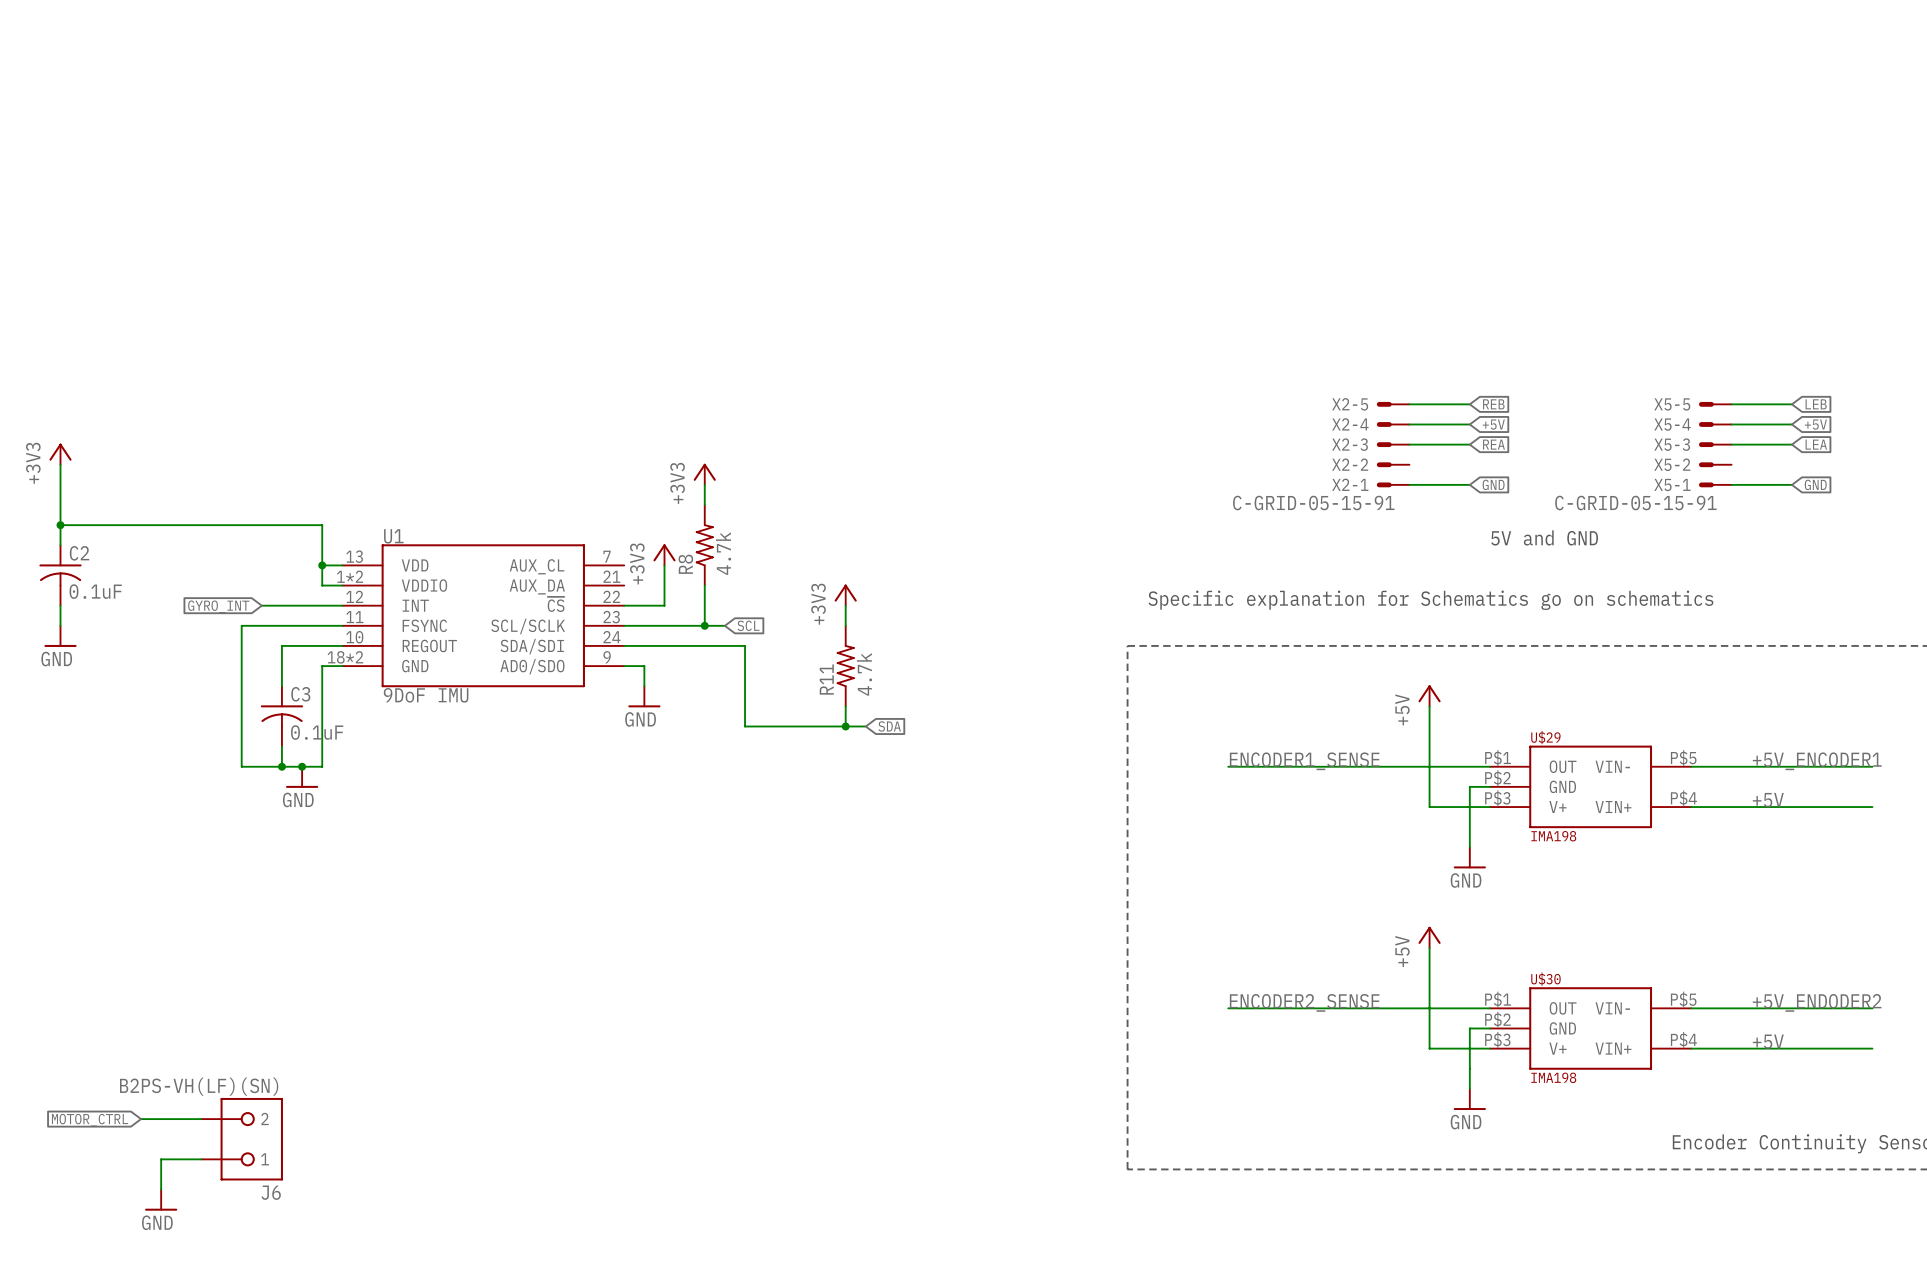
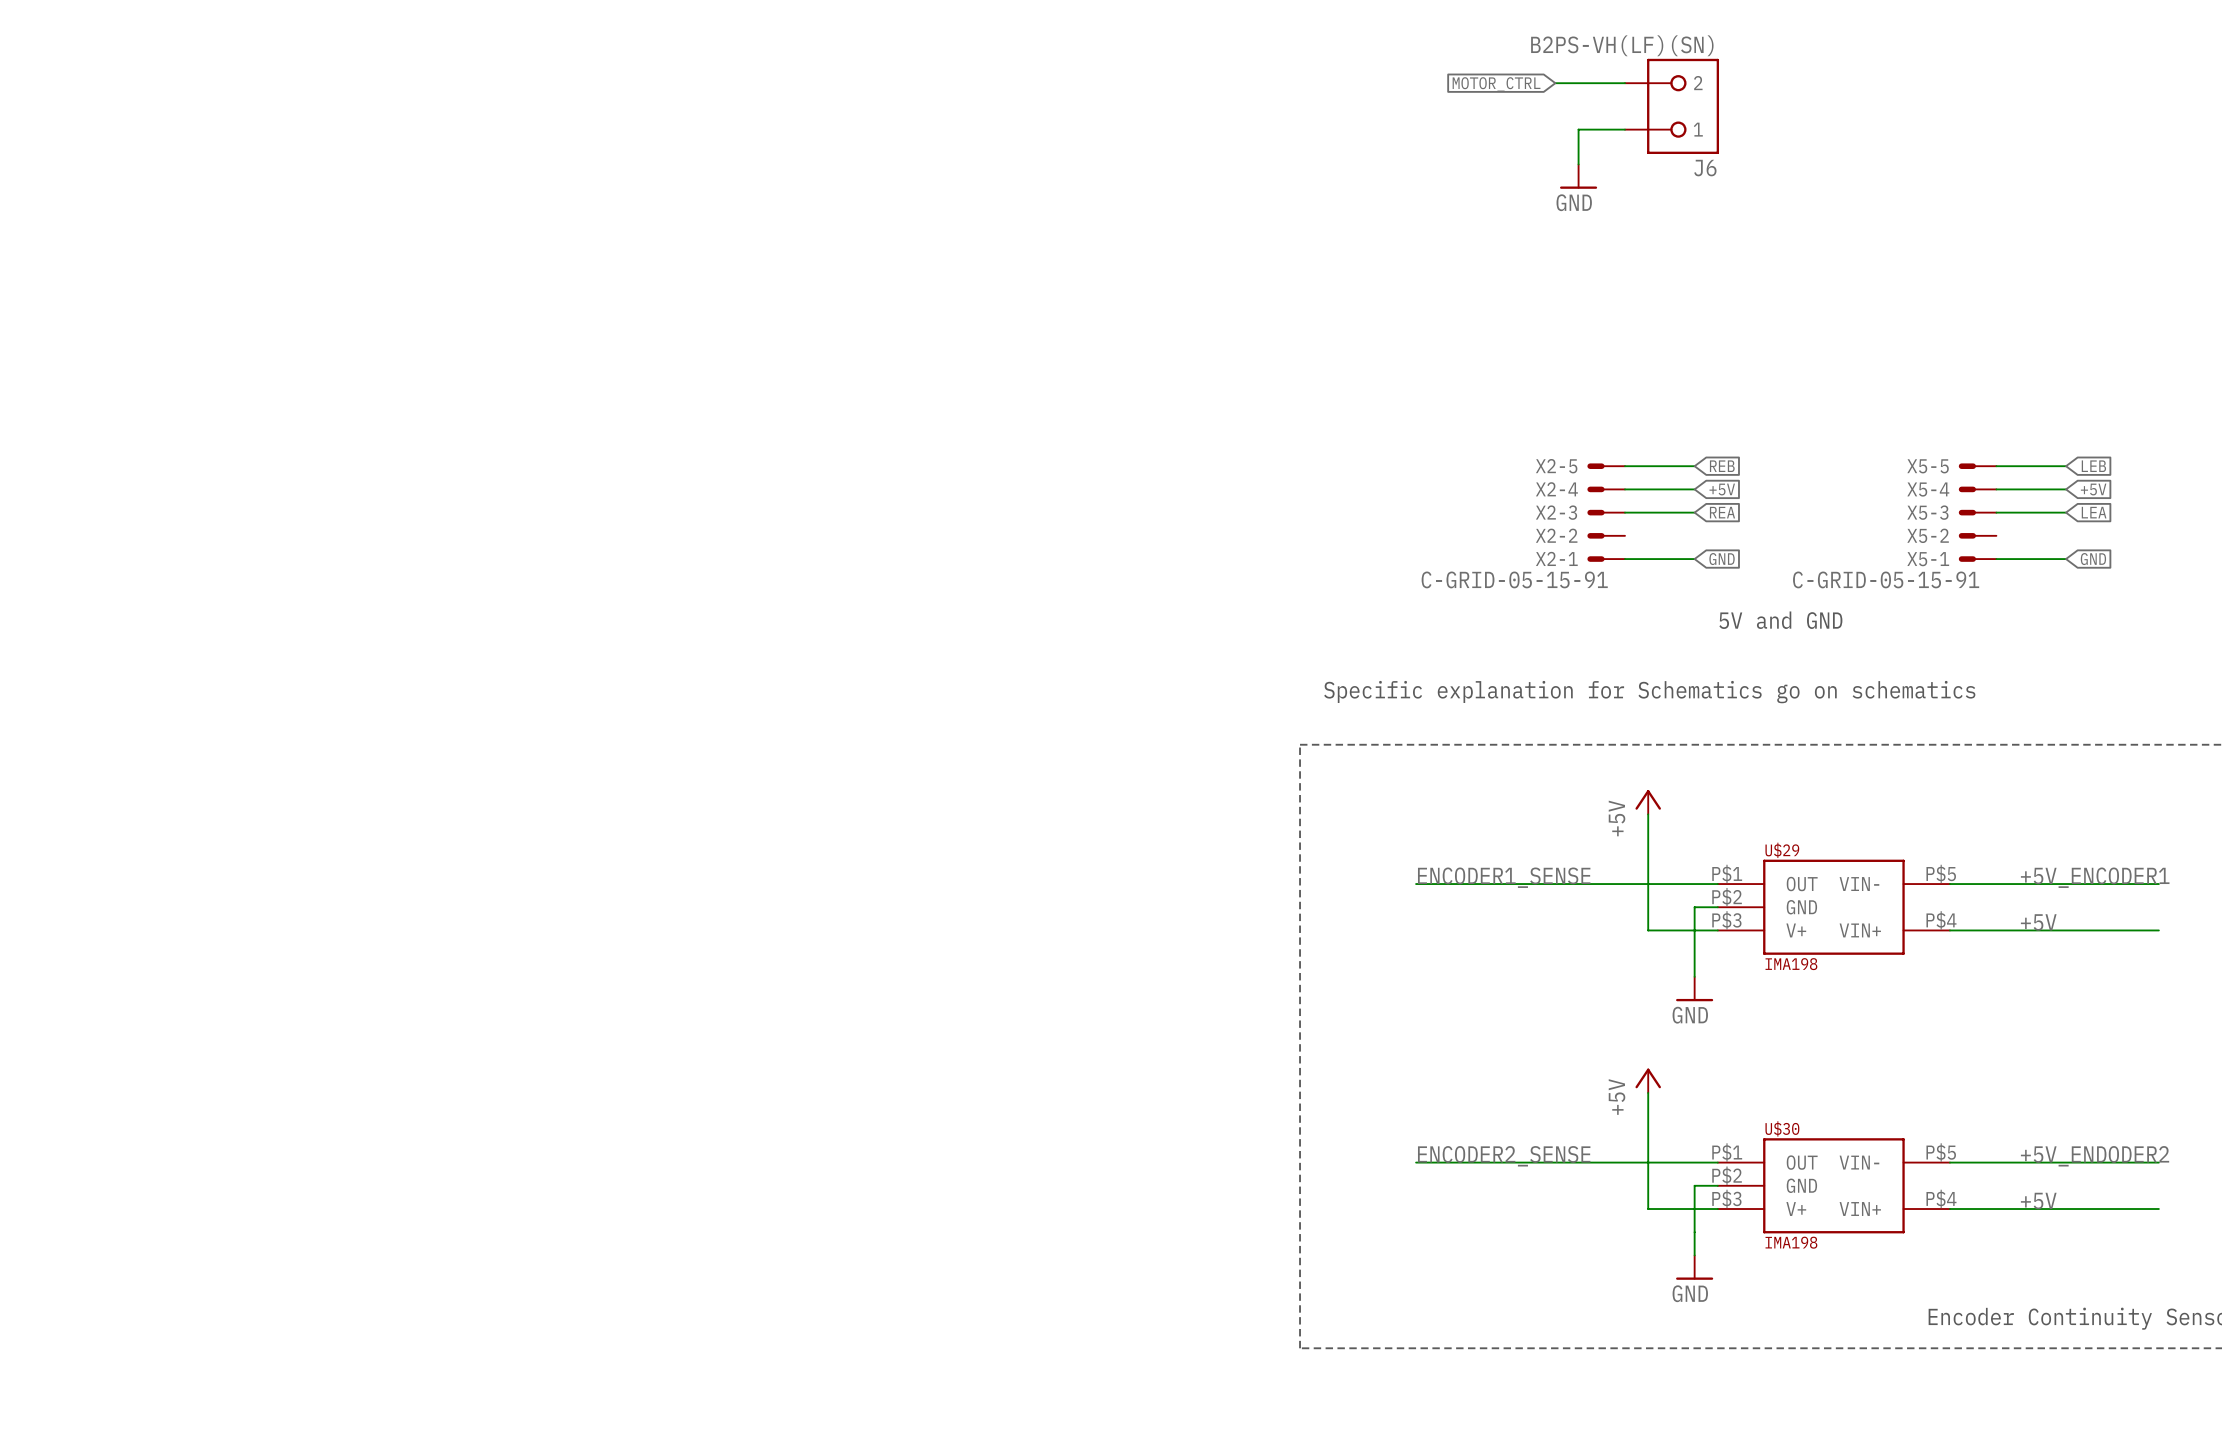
wire: none -> (1555, 83) (1625, 83)
global label: none -> MOTOR_CTRL (1496, 84)
wire: none -> (1625, 129) (1578, 129) (1578, 164)
power symbol: none -> GND (1578, 176)
power symbol: +3V3 (60, 454) -> none
wire: (60, 464) (60, 545) -> none
power symbol: +3V3 (704, 474) -> none
wire: (704, 484) (704, 505) -> none
wire: (60, 525) (322, 525) (322, 585) (342, 585) -> none
junction: (60, 525) -> none
R8: 4.7k (704, 545) -> none
power symbol: +3V3 (664, 554) -> none
wire: (322, 565) (342, 565) -> none
junction: (322, 565) -> none
wire: (664, 565) (664, 605) (624, 605) -> none
C2: 0.1uF (60, 575) -> none
wire: (704, 585) (704, 625) -> none
power symbol: +3V3 (845, 595) -> none
wire: (60, 605) (60, 625) -> none
wire: (261, 605) (342, 605) -> none
wire: (845, 605) (845, 625) -> none
global label: GYRO_INT (218, 606) -> none
U1: 9DoF IMU (483, 615) -> none
wire: (342, 625) (241, 625) (241, 766) (322, 766) (322, 666) (342, 666) -> none
wire: (624, 625) (724, 625) -> none
junction: (704, 625) -> none
global label: SCL (748, 625) -> none
power symbol: GND (60, 636) -> none
wire: (342, 645) (281, 645) (281, 686) -> none
wire: (624, 645) (745, 645) (745, 726) (865, 726) -> none
wire: (624, 666) (644, 666) (644, 686) -> none
R11: 4.7k (845, 666) -> none
power symbol: GND (644, 696) -> none
wire: (845, 706) (845, 726) -> none
C3: 0.1uF (281, 716) -> none
junction: (845, 726) -> none
global label: SDA (889, 726) -> none
wire: (281, 746) (281, 766) -> none
junction: (281, 766) -> none
junction: (302, 766) -> none
power symbol: GND (302, 777) -> none
wire: (141, 1119) (201, 1119) -> none
global label: MOTOR_CTRL (90, 1120) -> none
J6 position: (242, 1139) -> (1672, 106)
wire: (201, 1159) (161, 1159) (161, 1189) -> none
power symbol: GND (161, 1200) -> none

